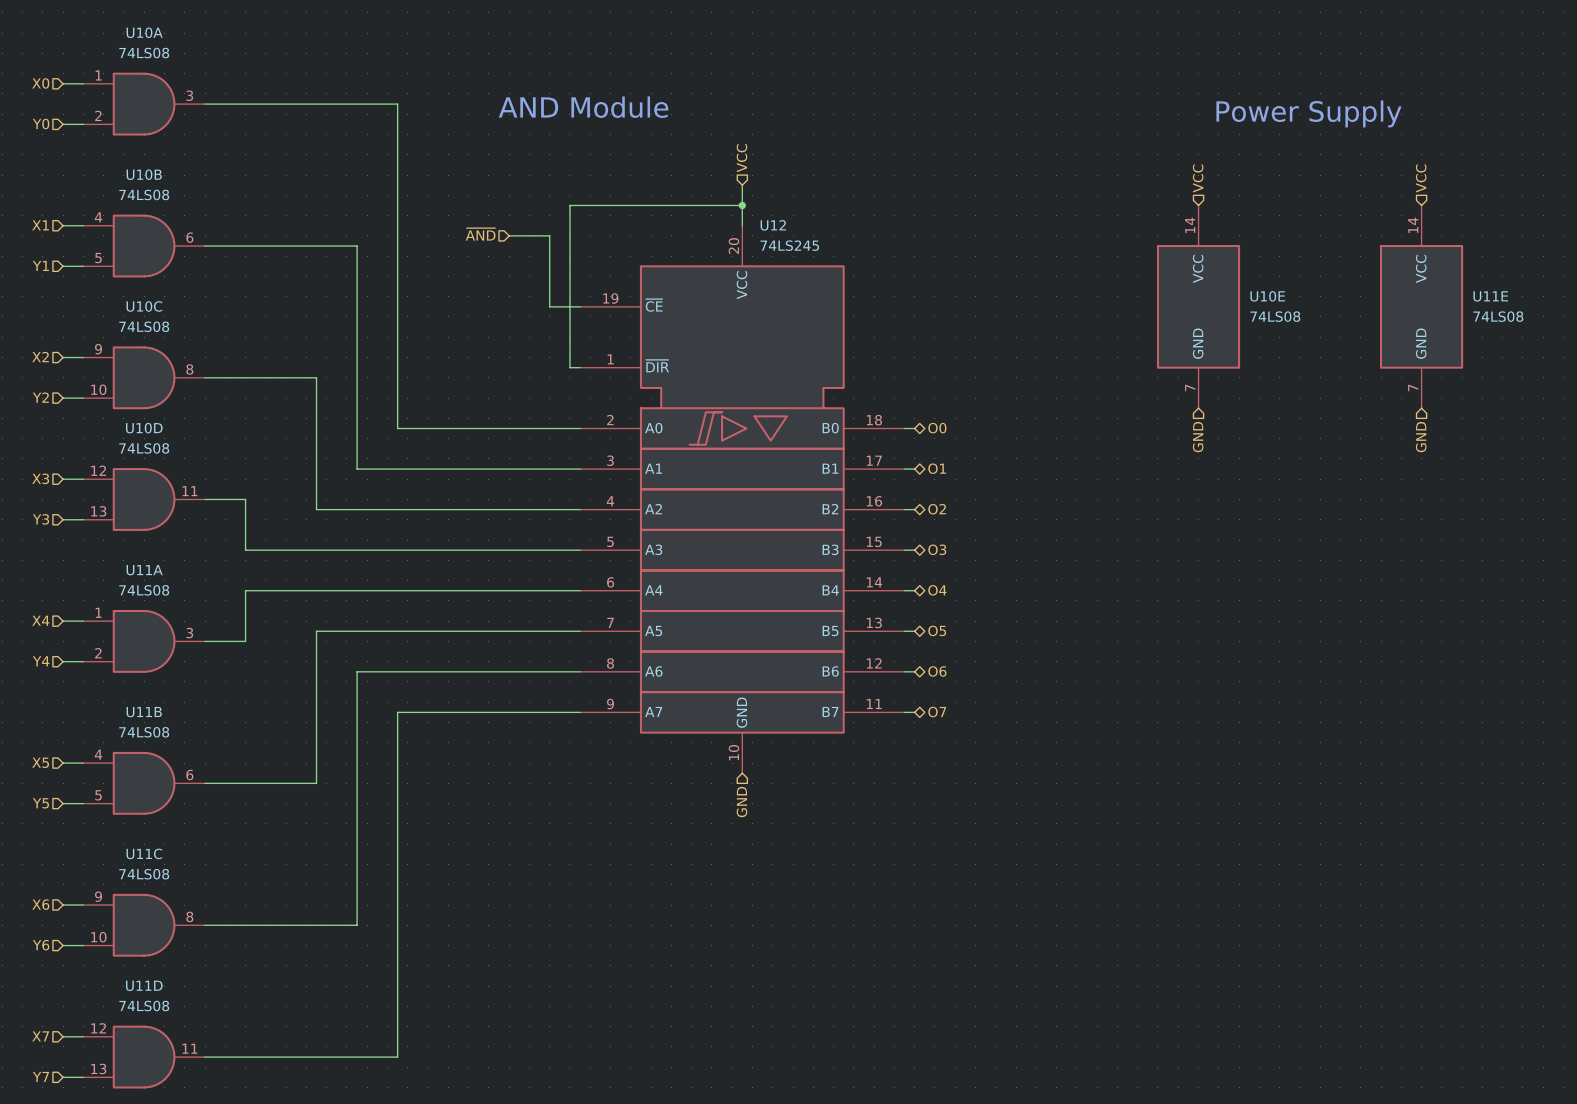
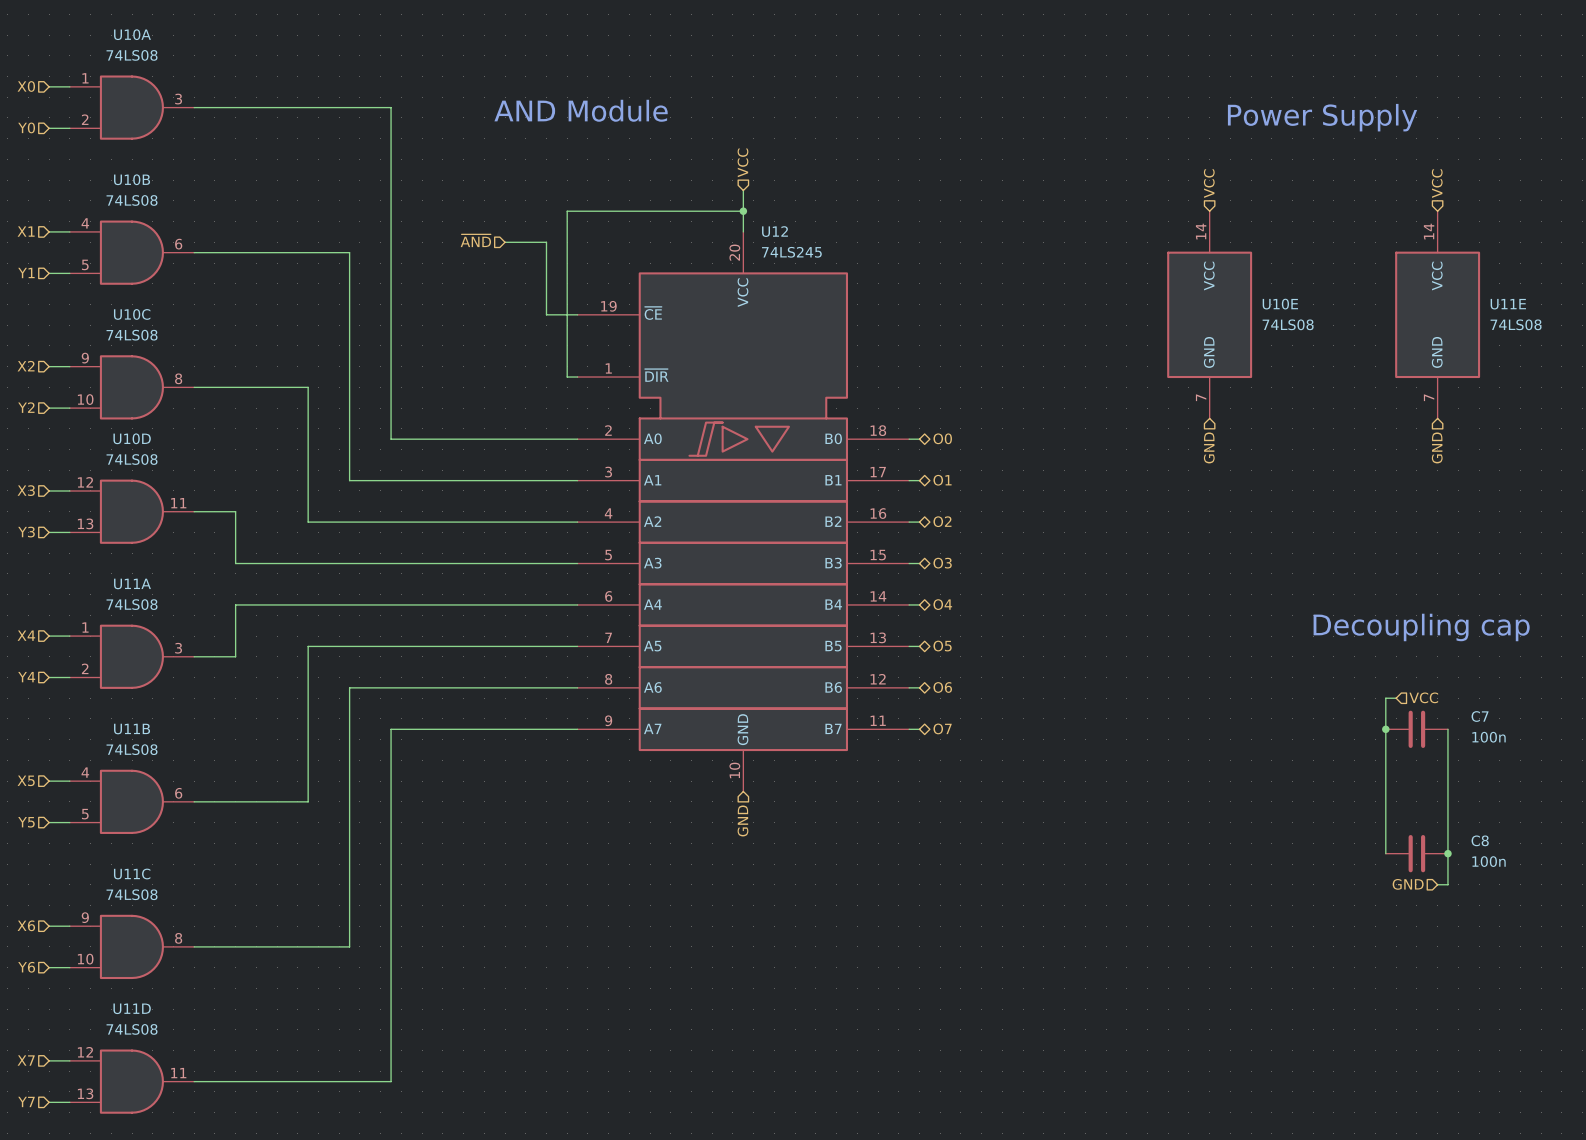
text: none -> Decoupling cap (1421, 627)
wire: none -> (1396, 698) (1385, 698) (1385, 853)
hierarchical label: none -> VCC (1423, 697)
junction: none -> (1385, 729)
C7: none -> 100n (1416, 729)
wire: none -> (1447, 729) (1447, 884) (1437, 884)
C8: none -> 100n (1416, 853)
junction: none -> (1447, 853)
hierarchical label: none -> GND (1408, 884)

